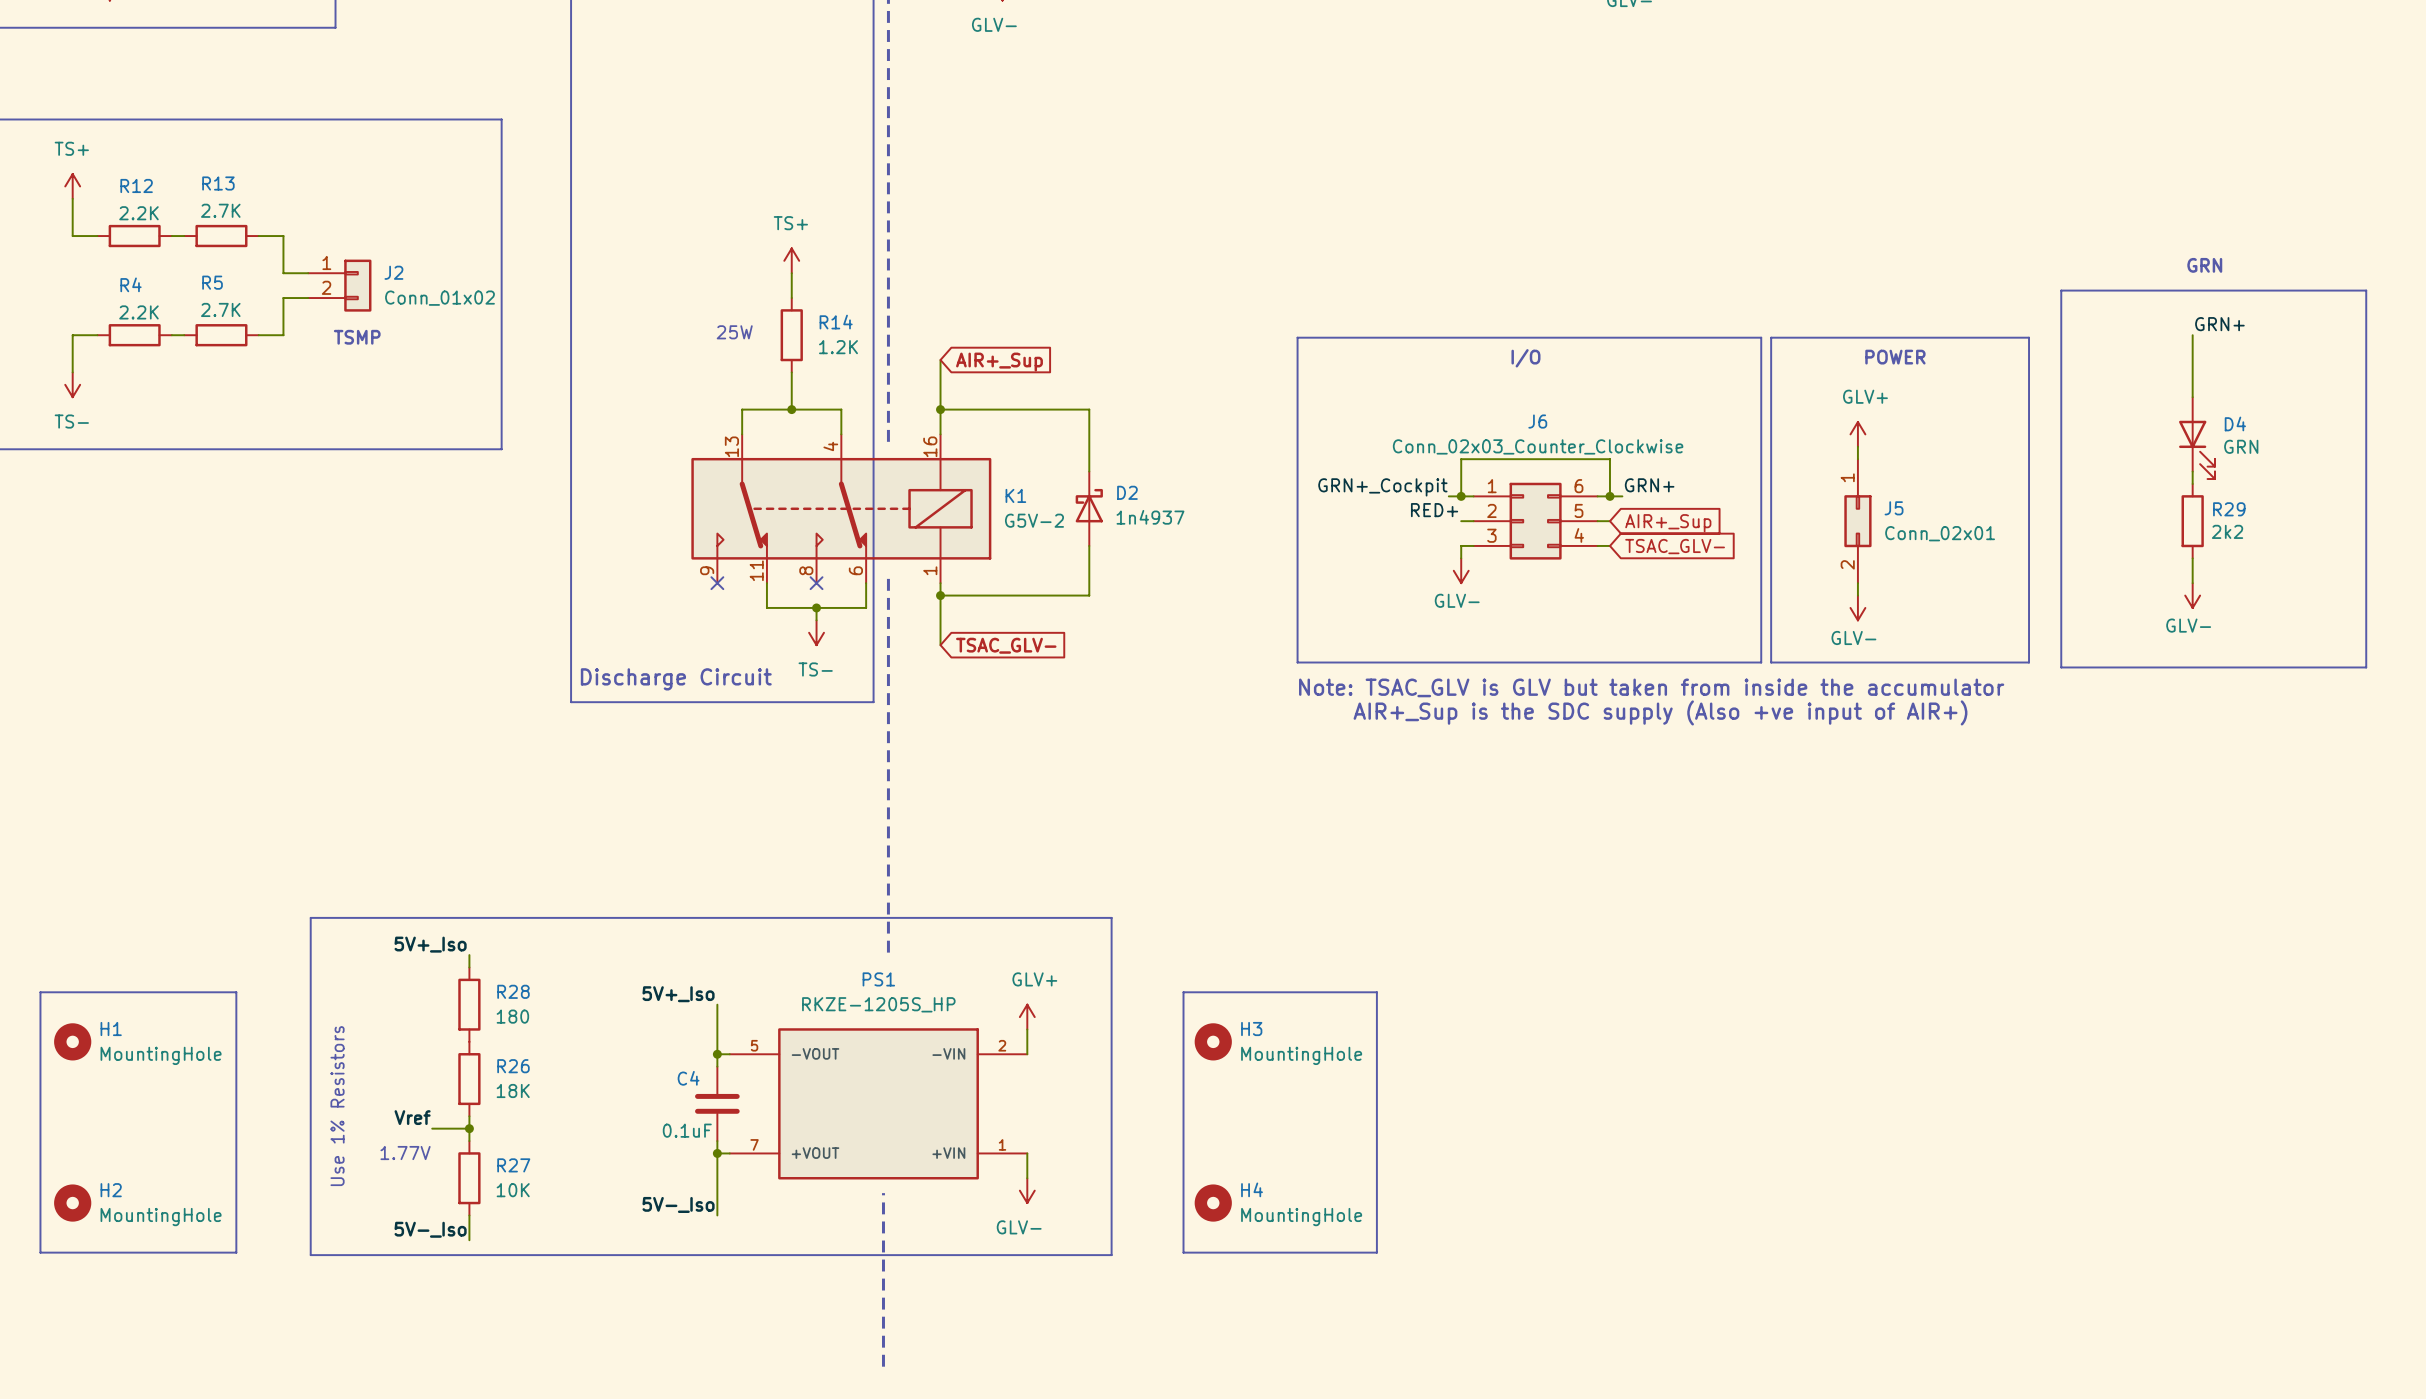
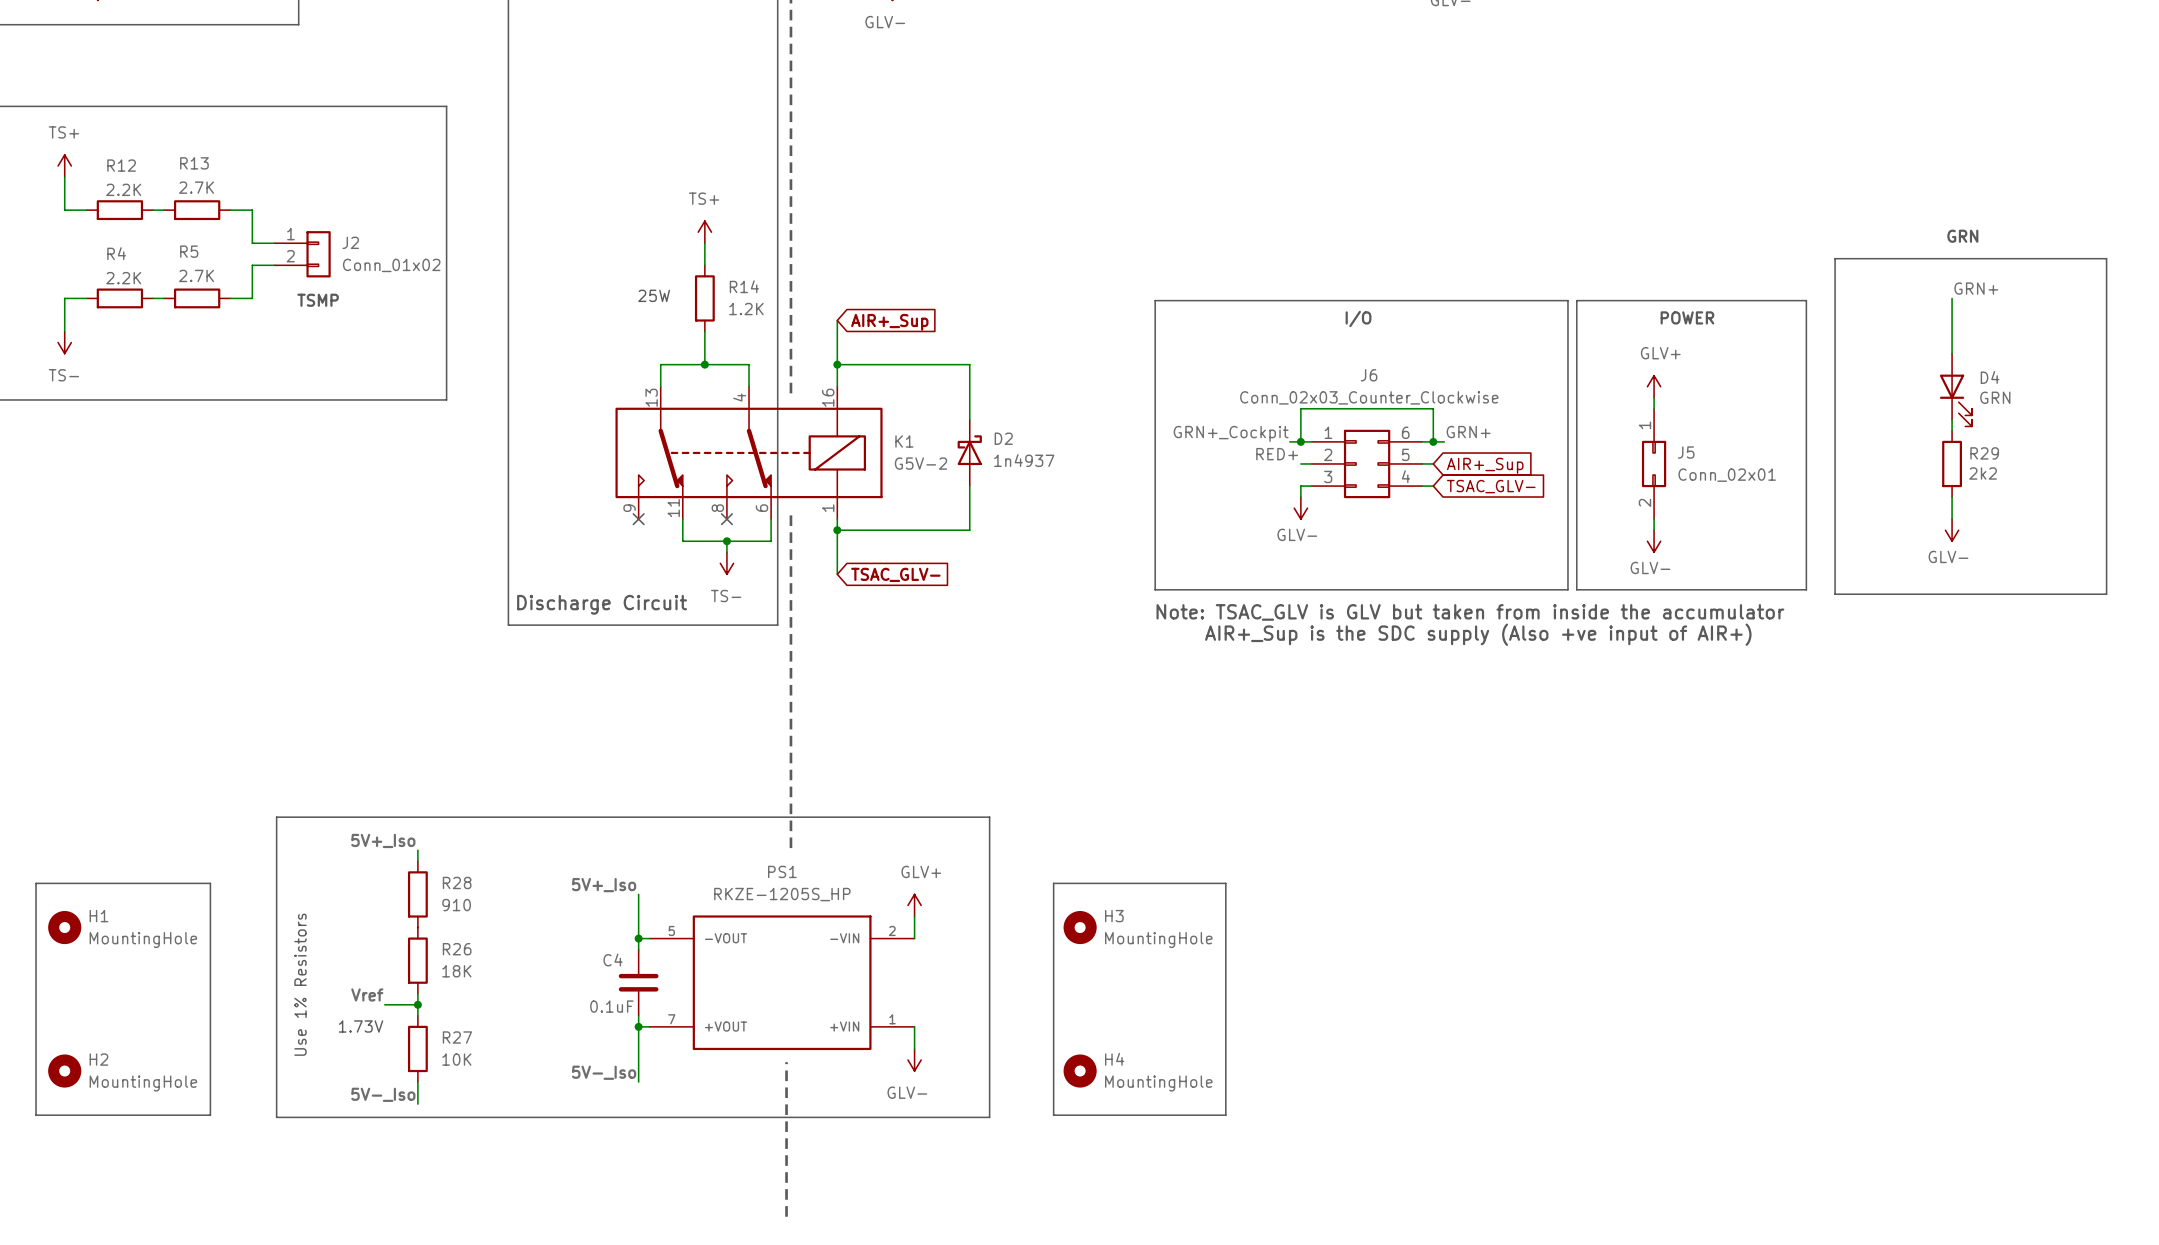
R28 value: 180 (512, 1016) -> 910 (456, 905)
text: 1.77V (405, 1153) -> 1.73V (361, 1026)

